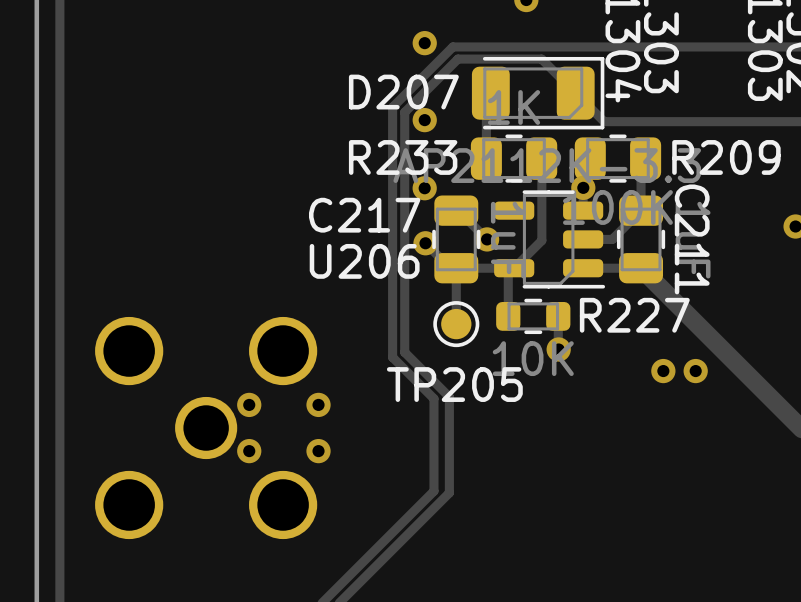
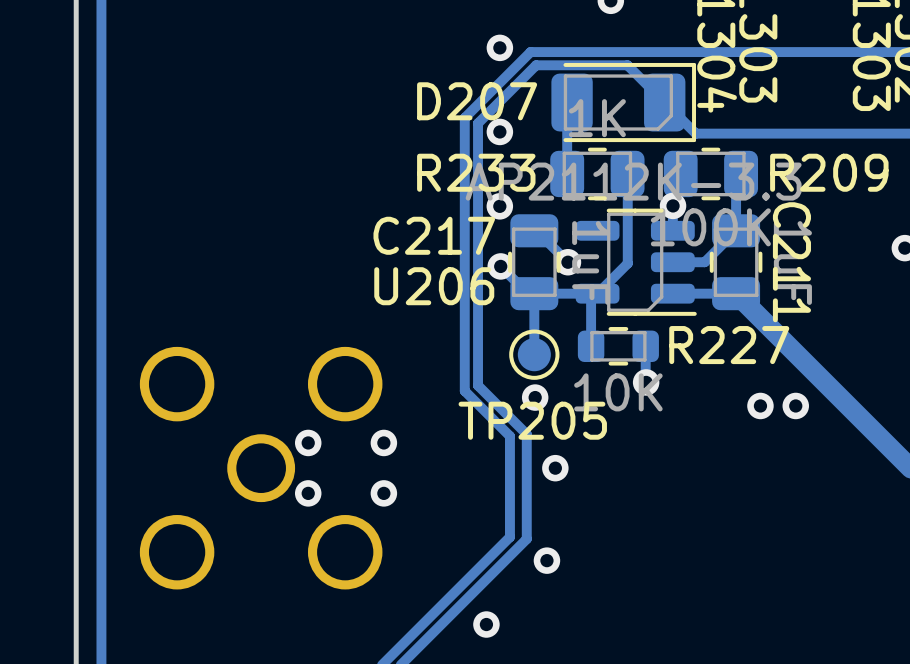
via: none -> (535, 397)
via: none -> (555, 468)
via: none -> (546, 560)
via: none -> (486, 624)

